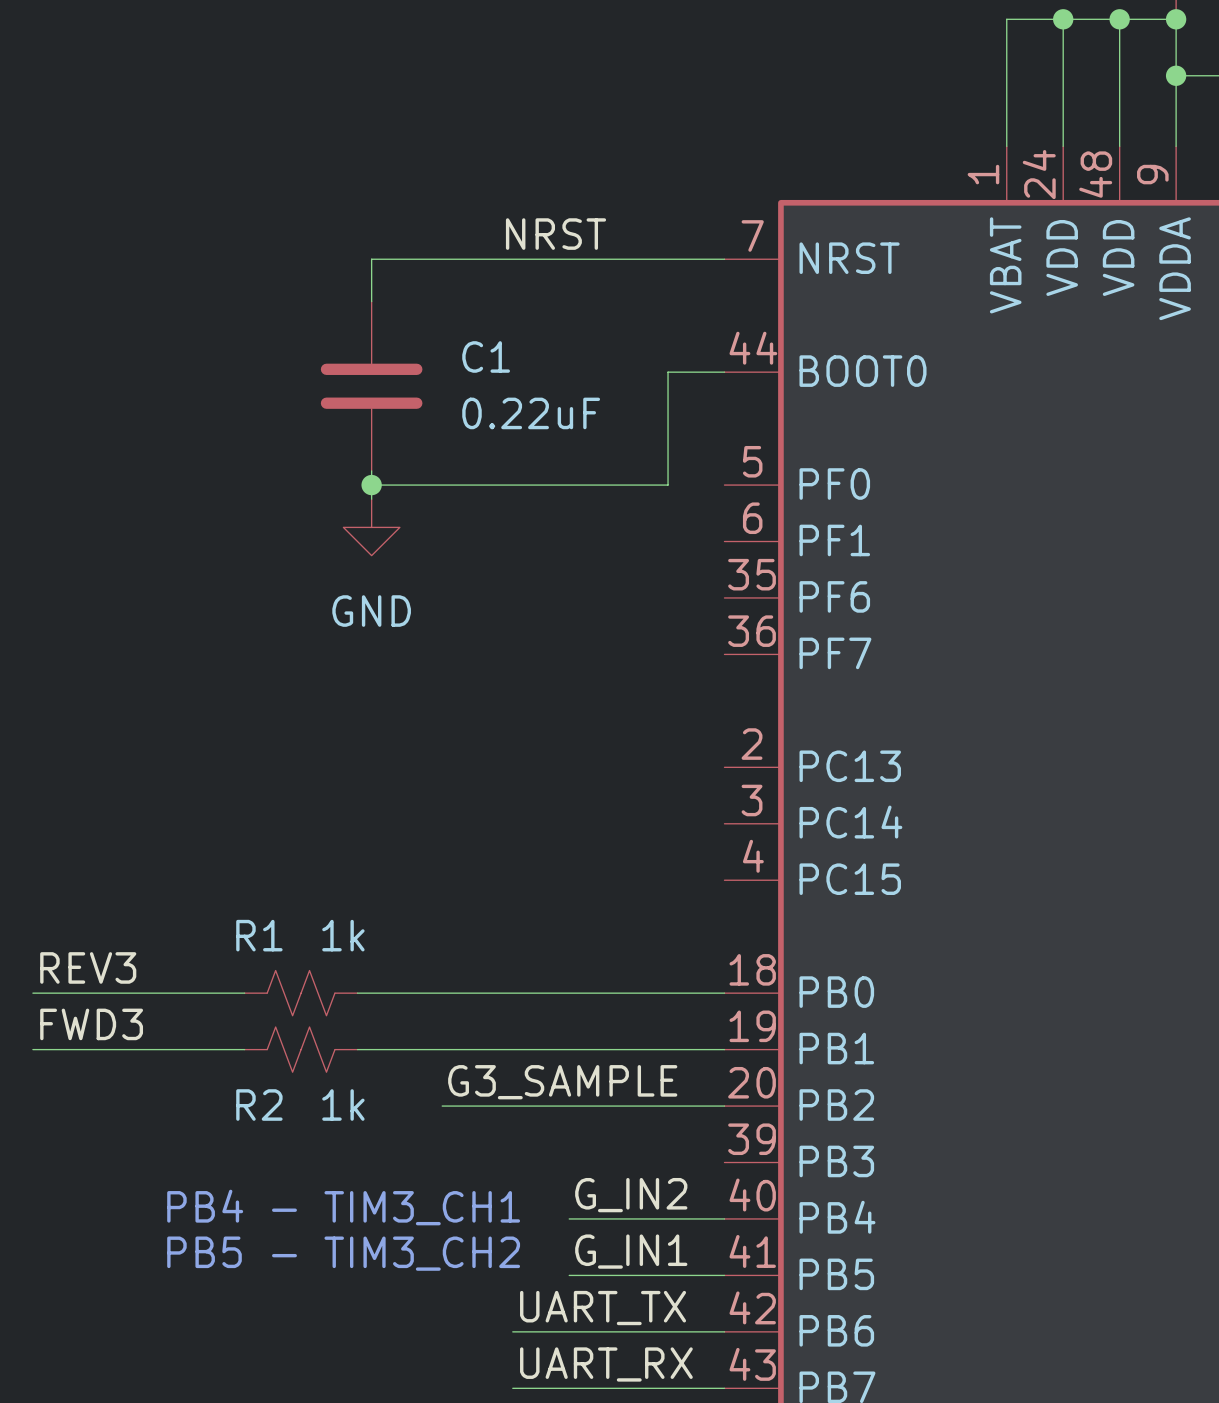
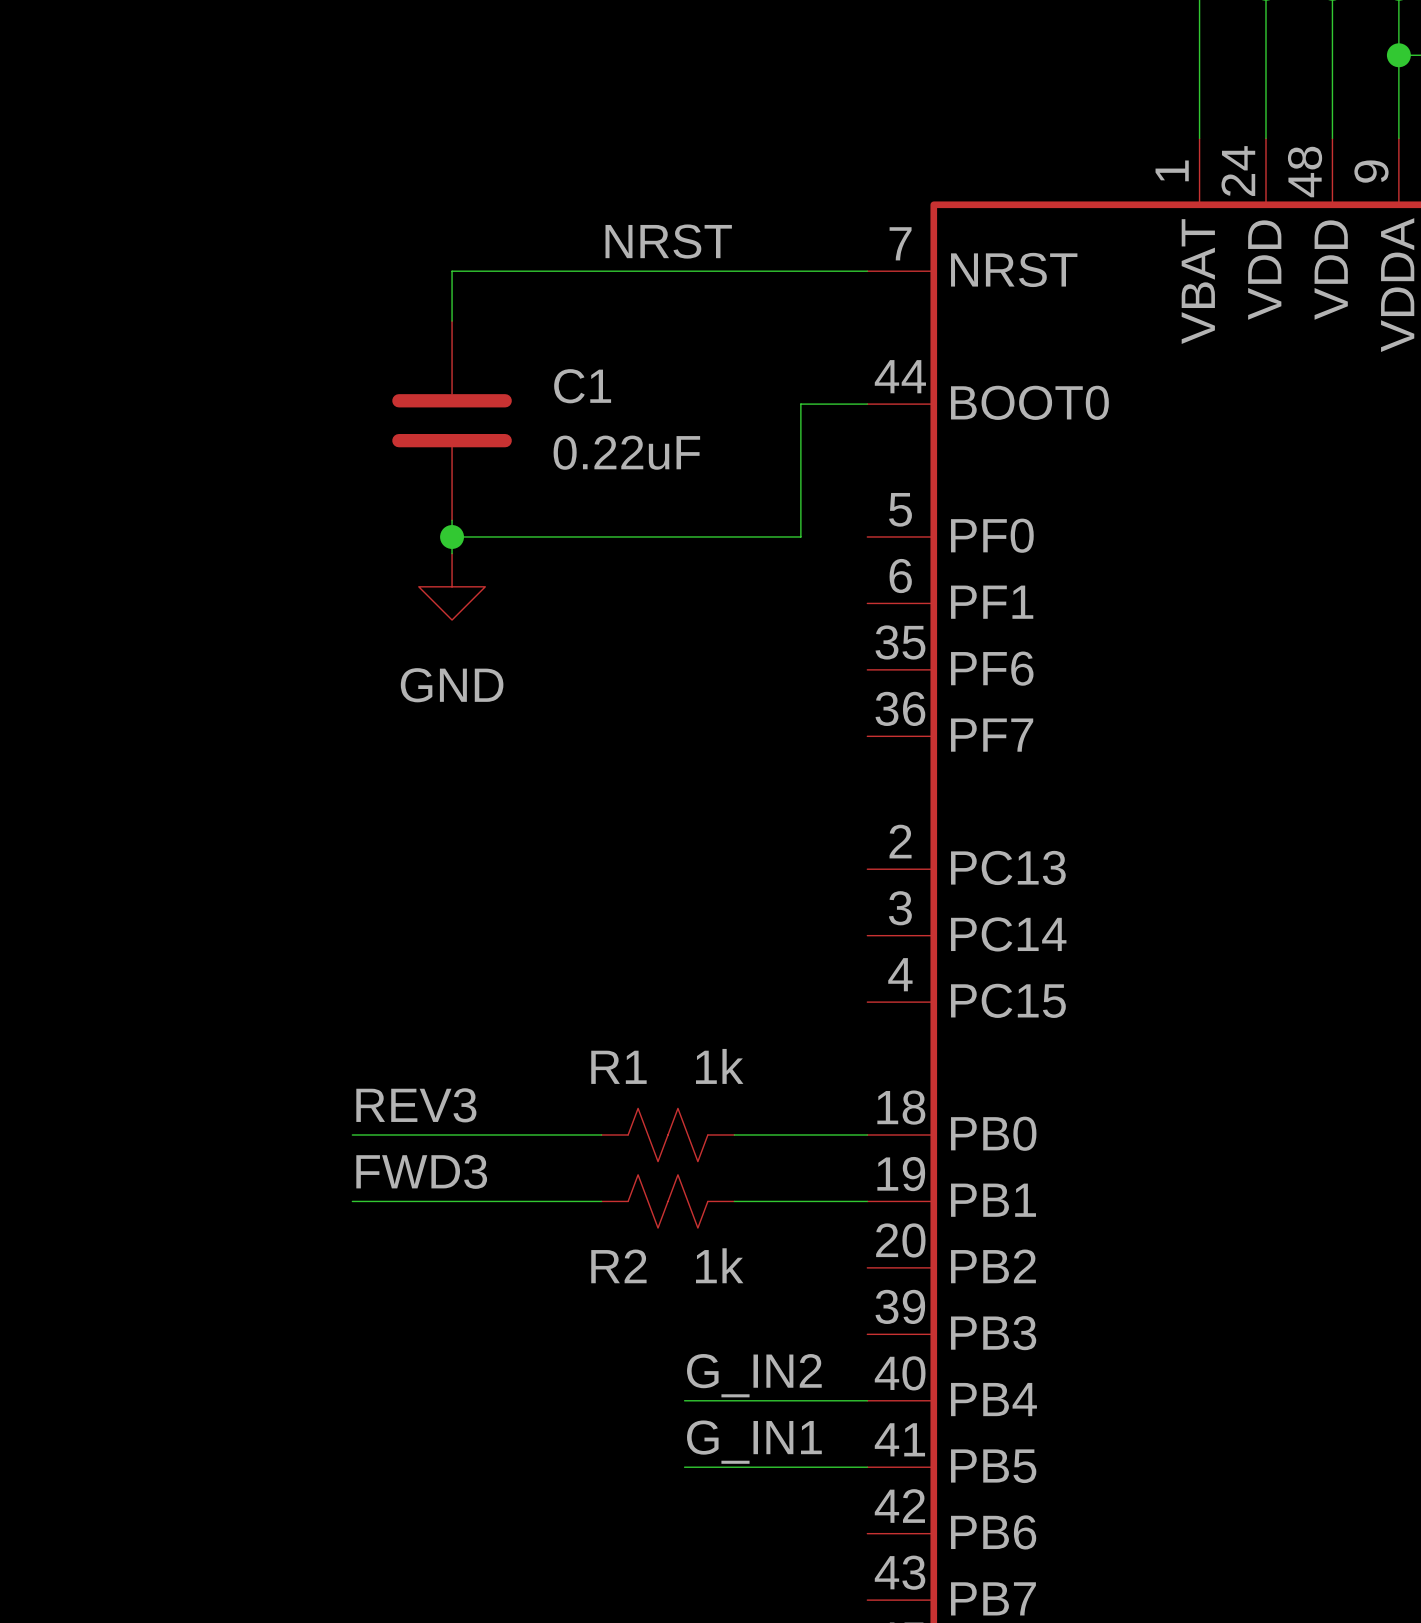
label position: REV3 (88, 967) -> REV3 (416, 1105)
wire: (32, 993) (244, 993) -> none
wire: none -> (352, 1135) (435, 1135)
R1 position: (301, 993) -> (667, 1135)
wire: (498, 993) (611, 993) -> none
label position: FWD3 (91, 1024) -> FWD3 (421, 1171)
wire: (32, 1049) (244, 1049) -> none
wire: none -> (352, 1201) (435, 1201)
R2 position: (301, 1049) -> (667, 1201)
wire: (498, 1049) (611, 1049) -> none
label: G3_SAMPLE (562, 1082) -> none
wire: (442, 1106) (724, 1106) -> none
text: PB4 - TIM3_CH1 (343, 1207) -> none
text: PB5 - TIM3_CH2 (343, 1253) -> none
label: UART_TX (603, 1308) -> none
wire: (512, 1331) (724, 1331) -> none
label: UART_RX (606, 1364) -> none
wire: (512, 1388) (724, 1388) -> none

